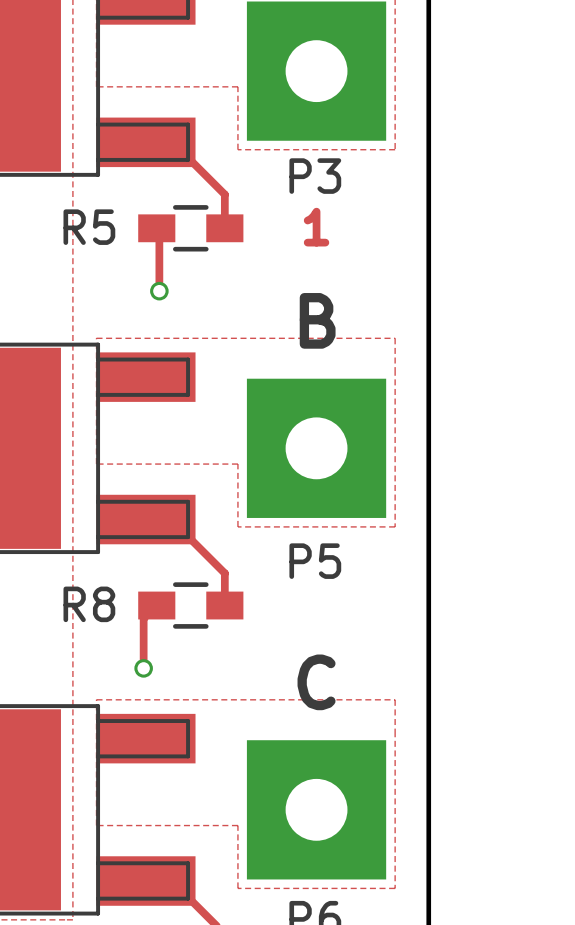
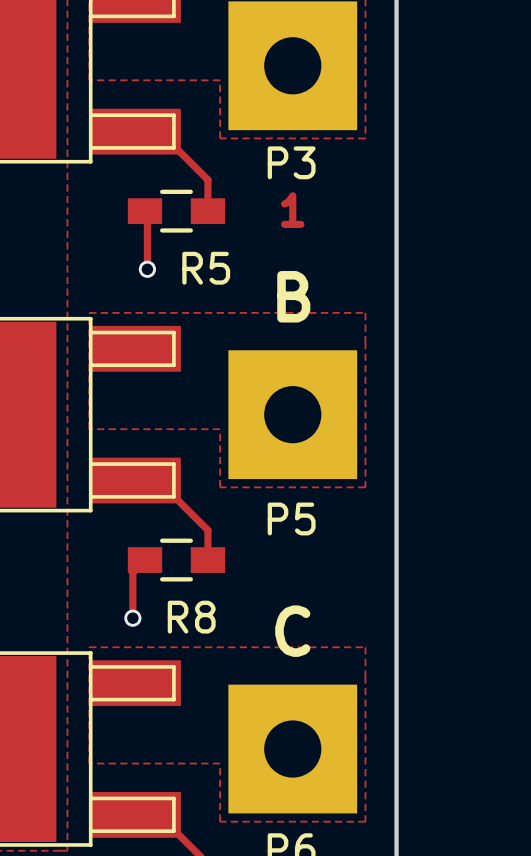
R5 name position: R5 (89, 227) -> R5 (206, 268)
R8 name position: R8 (89, 604) -> R8 (191, 617)

